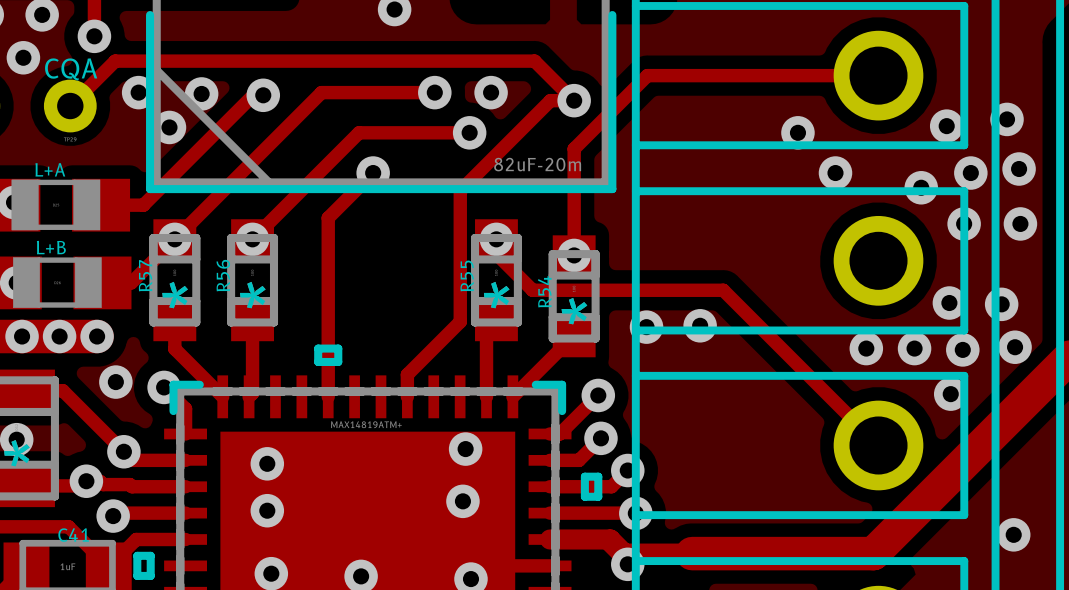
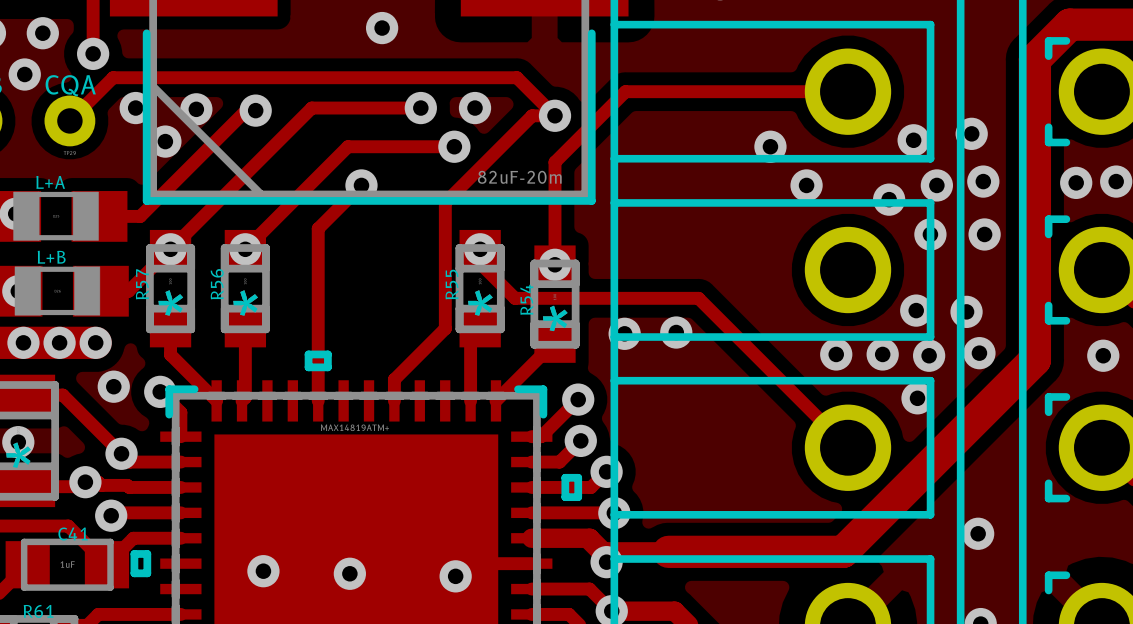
via: (465, 449) -> none
via: (267, 463) -> none
via: (462, 501) -> none
via: (267, 510) -> none

